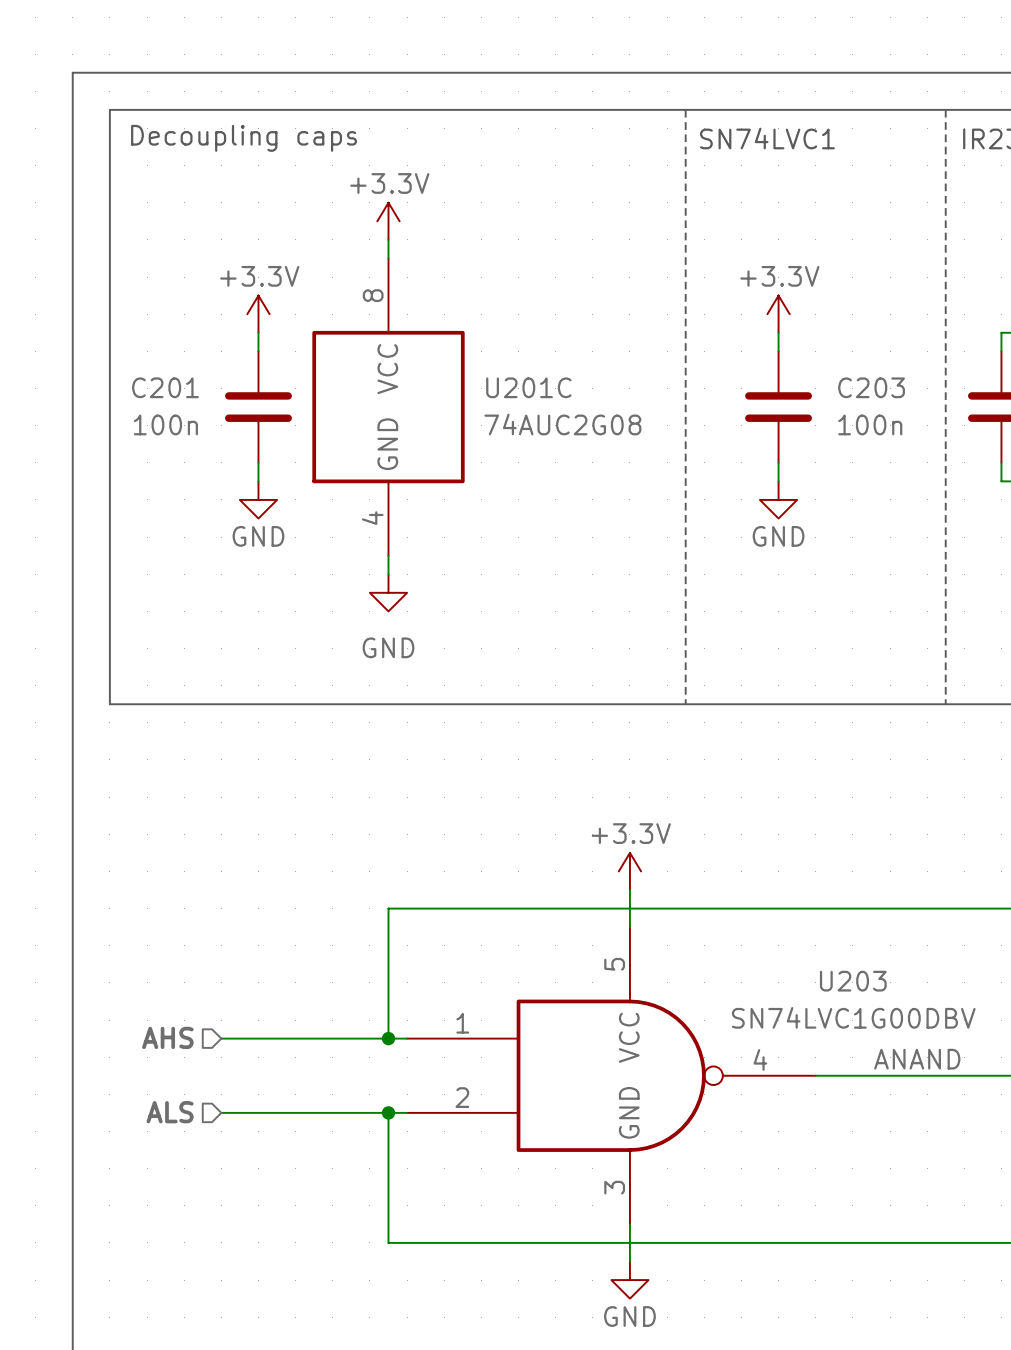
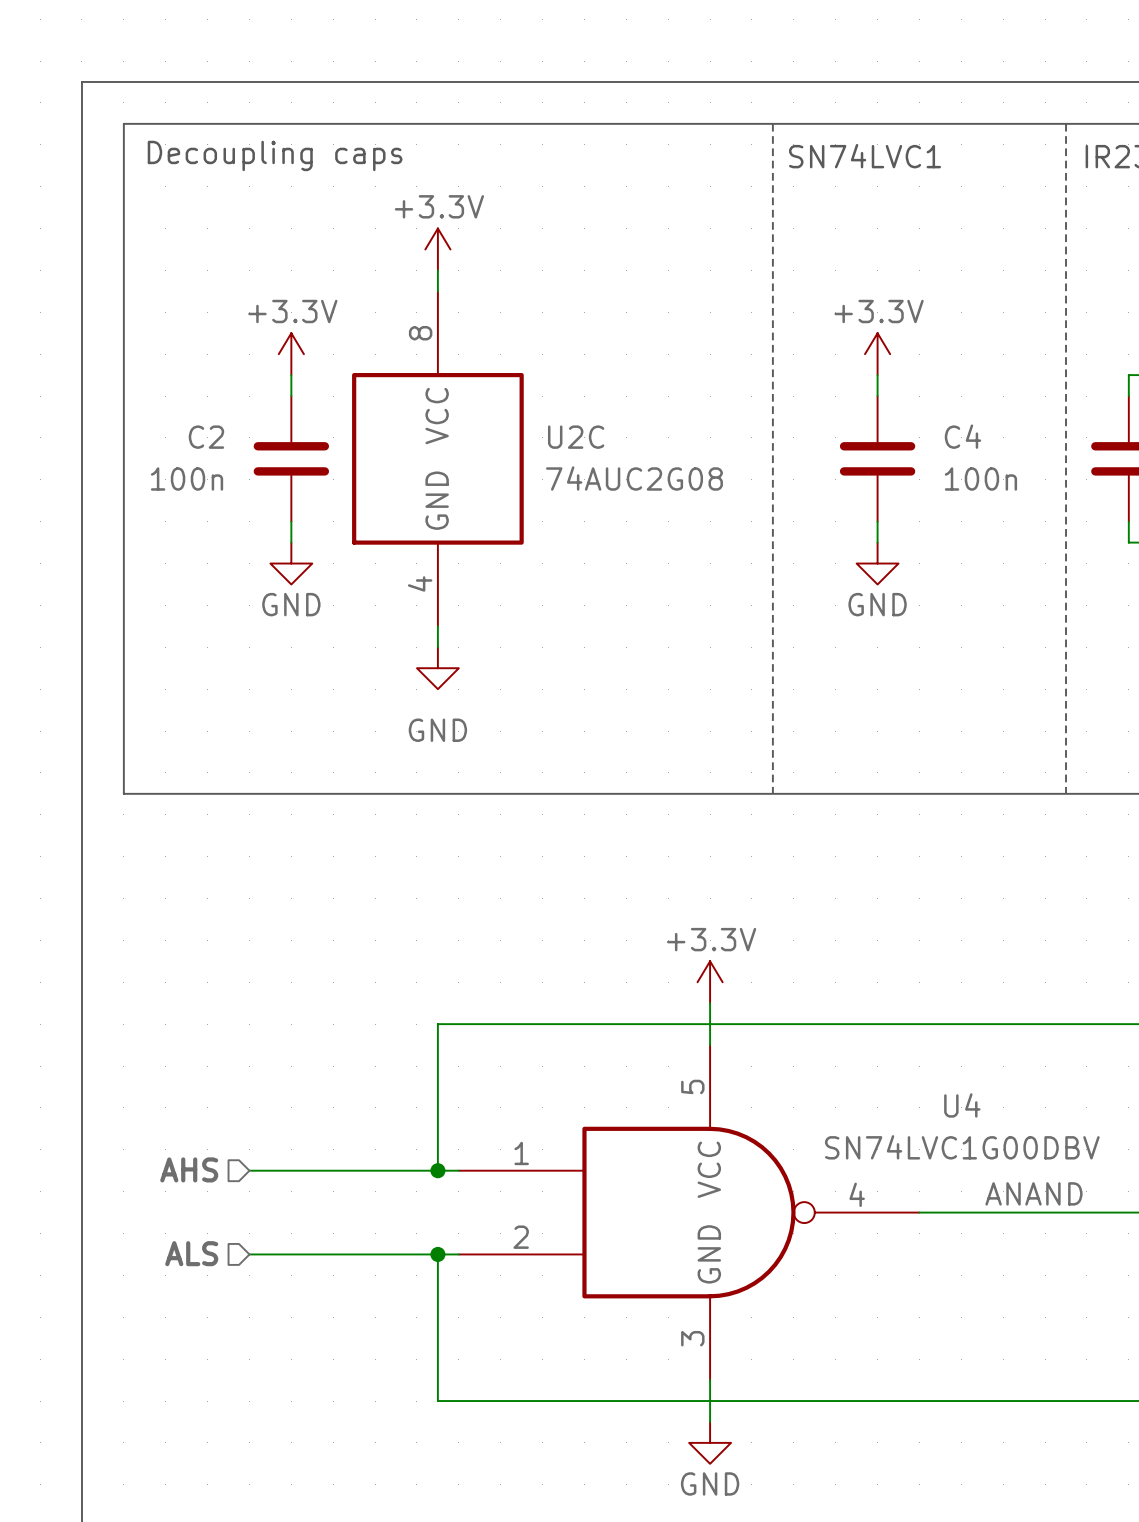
C201 name: C201 (165, 387) -> C2 (206, 437)
U201C name: U201C (528, 387) -> U2C (576, 437)
C203 name: C203 (871, 387) -> C4 (962, 436)
U203 name: U203 (853, 981) -> U4 (962, 1105)

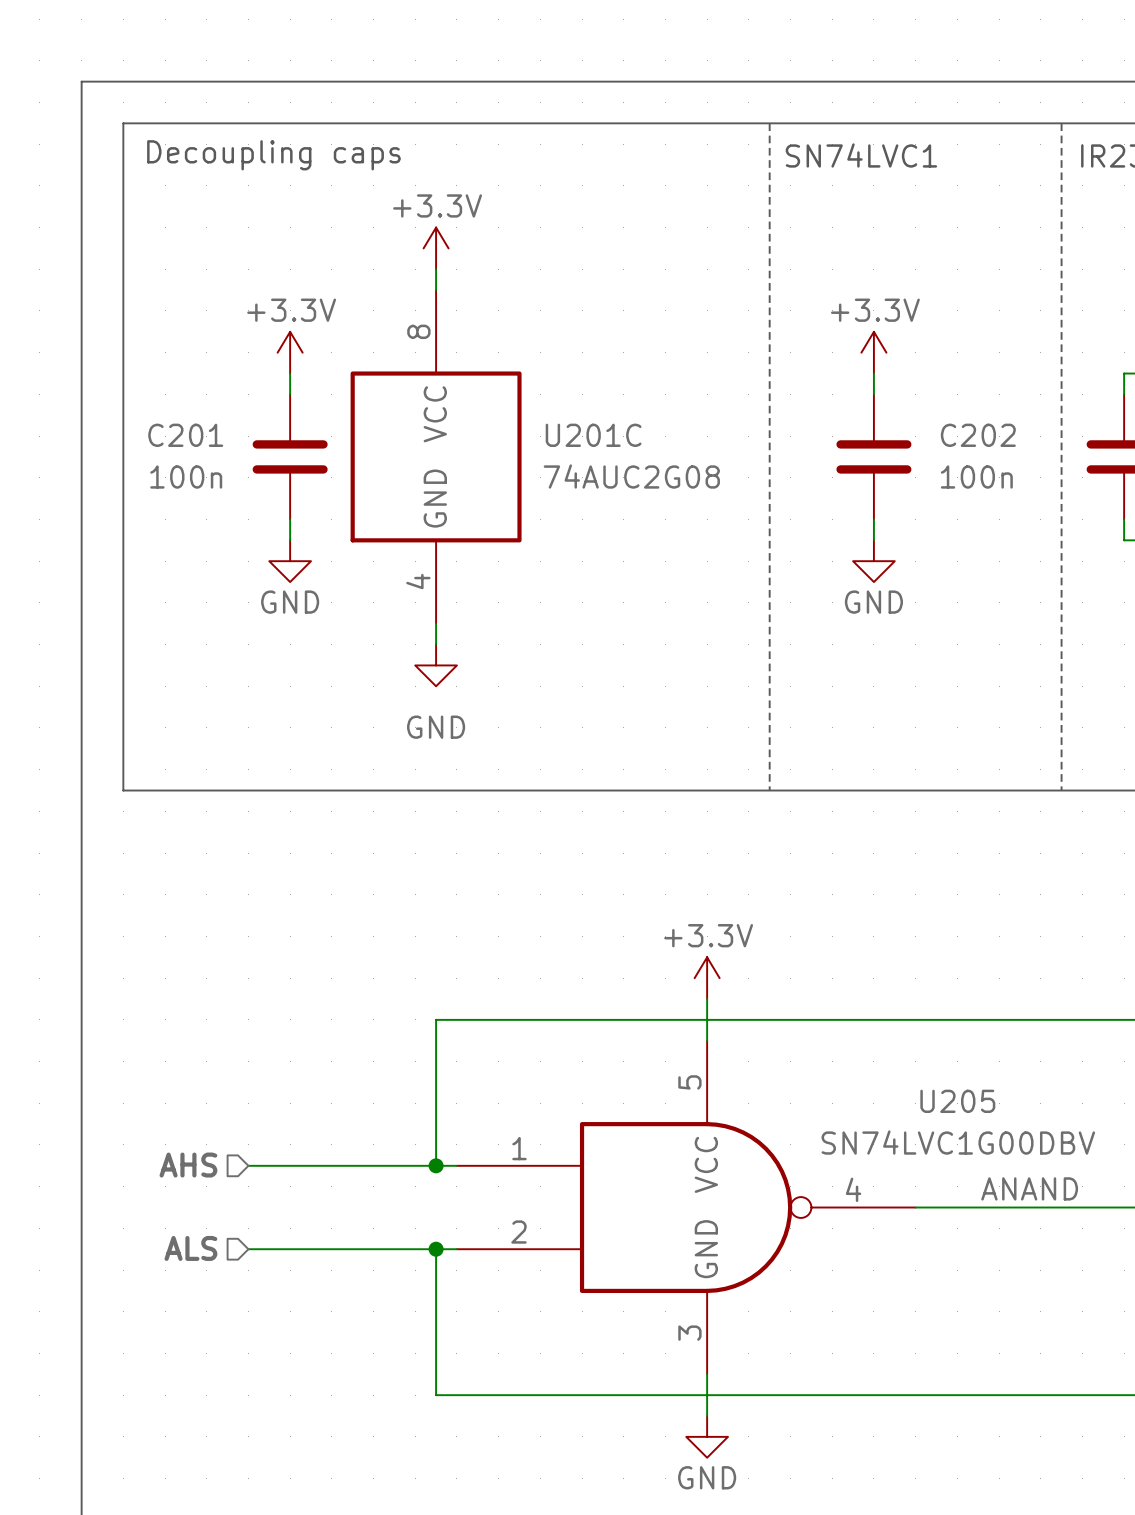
C4 name: C4 (962, 436) -> C202 (978, 435)
C2 name: C2 (206, 437) -> C201 (185, 435)
U2C name: U2C (576, 437) -> U201C (593, 435)
U4 name: U4 (962, 1105) -> U205 (957, 1101)

